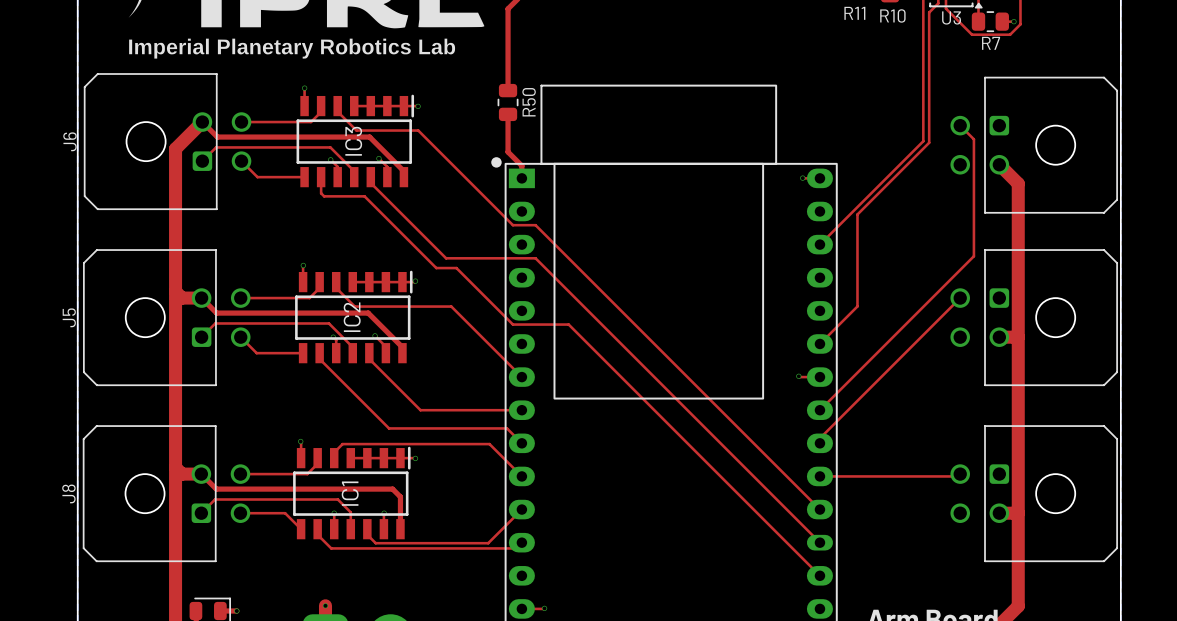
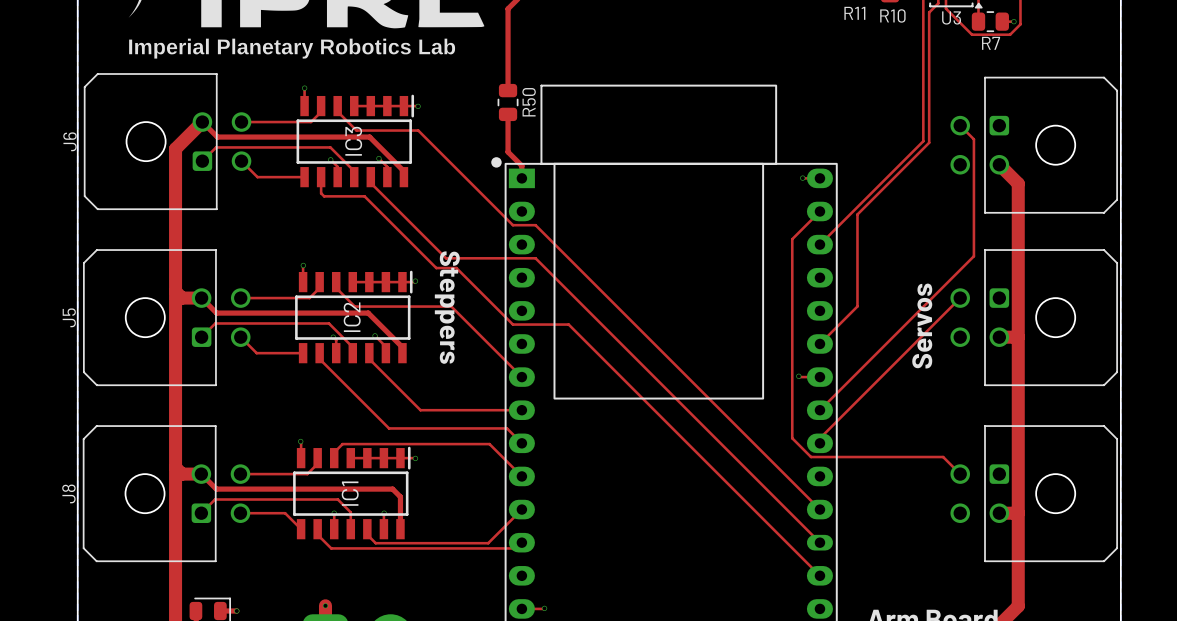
top track: none -> (819, 211) (792, 239) (792, 438) (811, 457) (943, 457) (960, 474)
text: none -> Steppers (447, 307)
text: none -> Servos (922, 326)
top track: (819, 476) (957, 476) -> none

